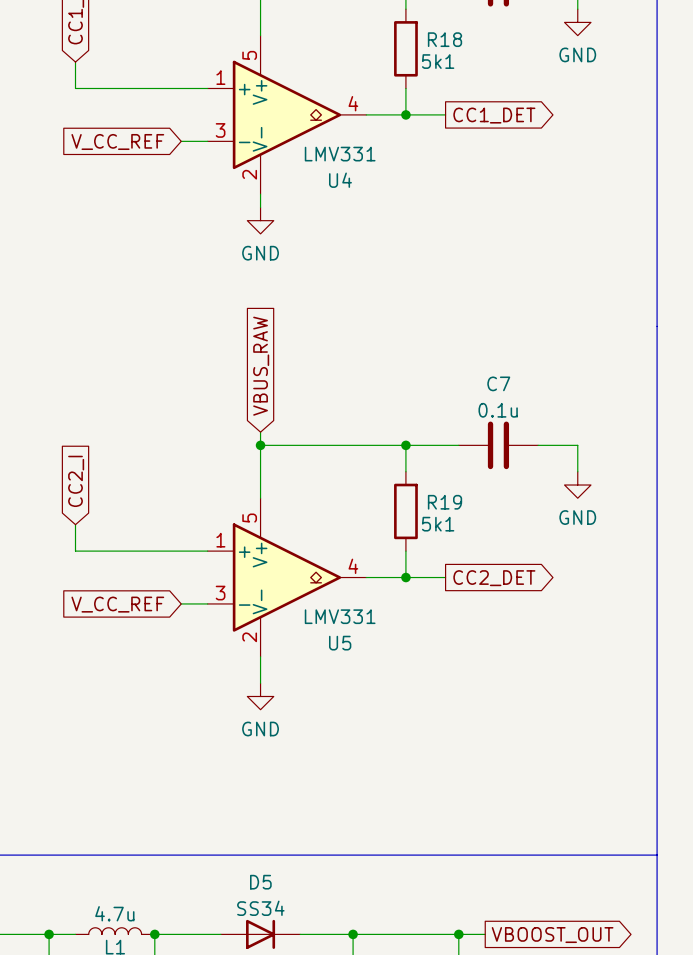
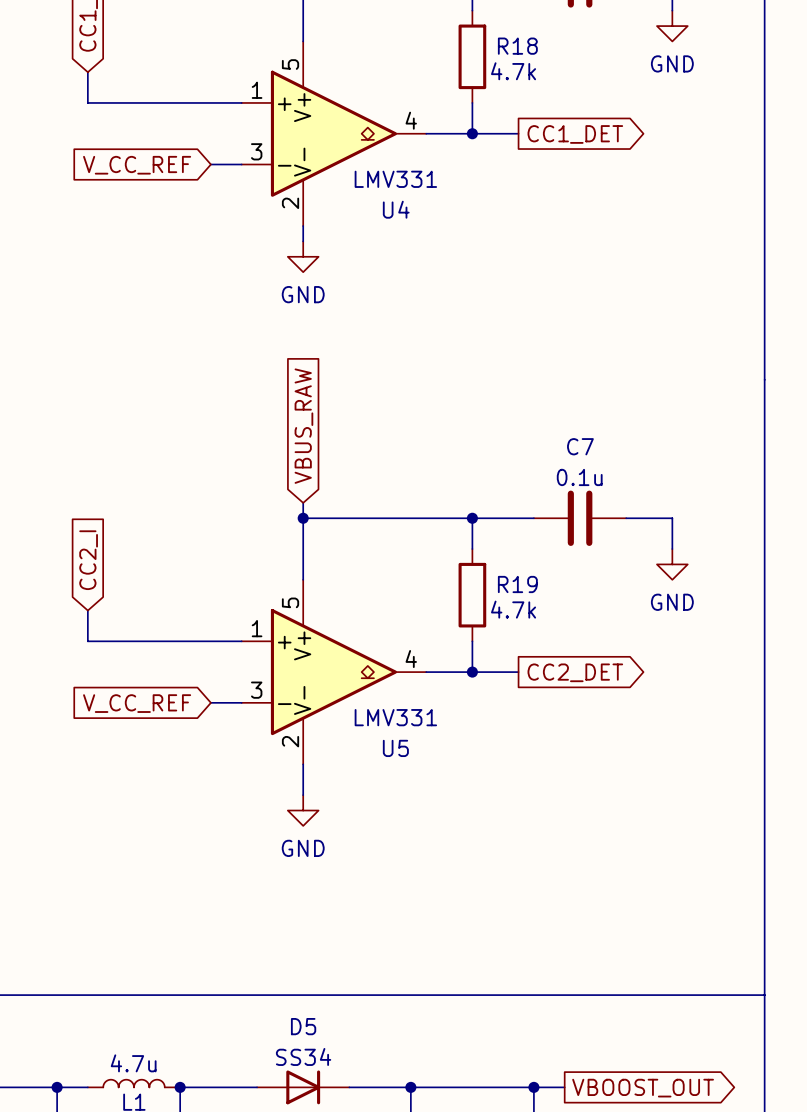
R18 value: 5k1 (438, 61) -> 4.7k (513, 71)
R19 value: 5k1 (438, 524) -> 4.7k (513, 609)

